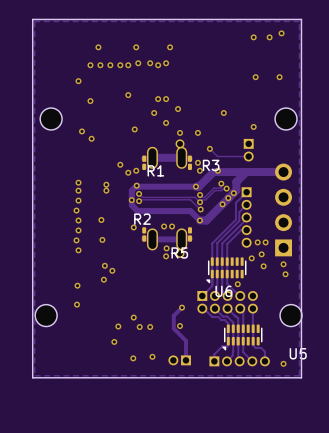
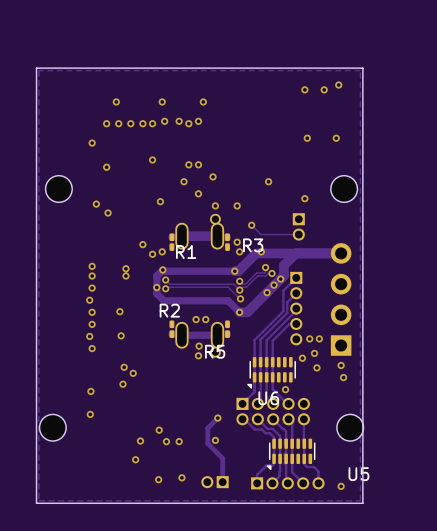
via: (133, 227) -> none

